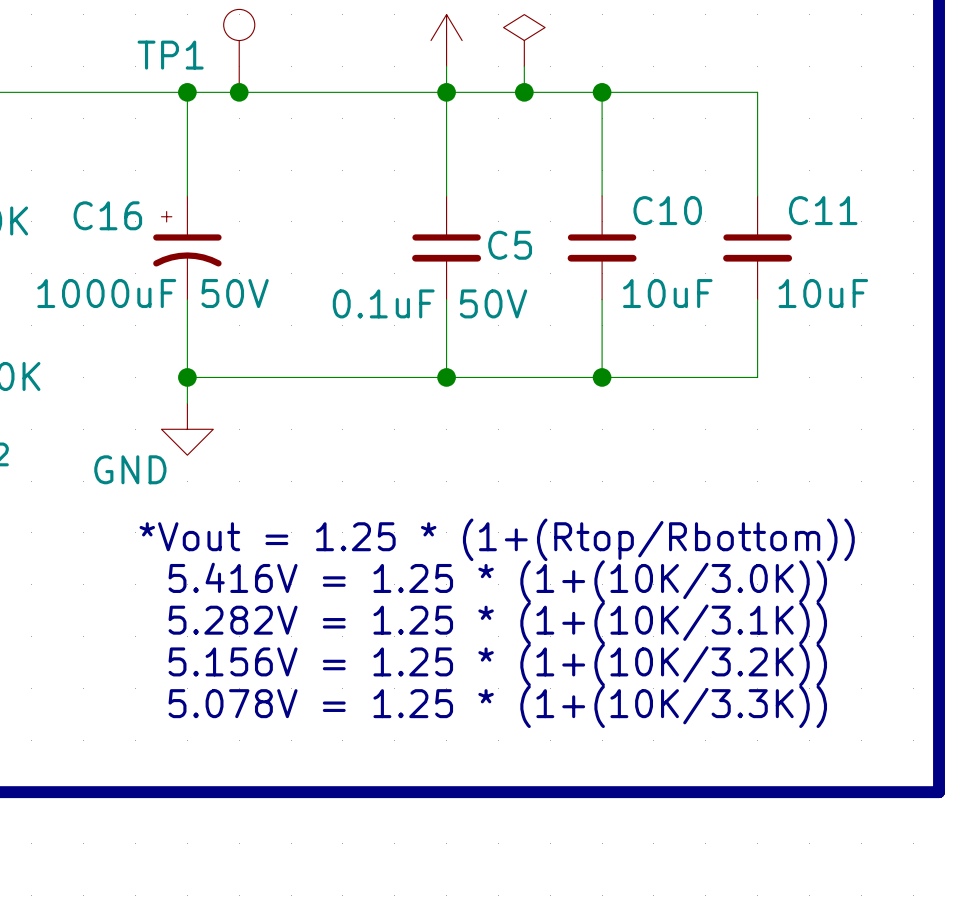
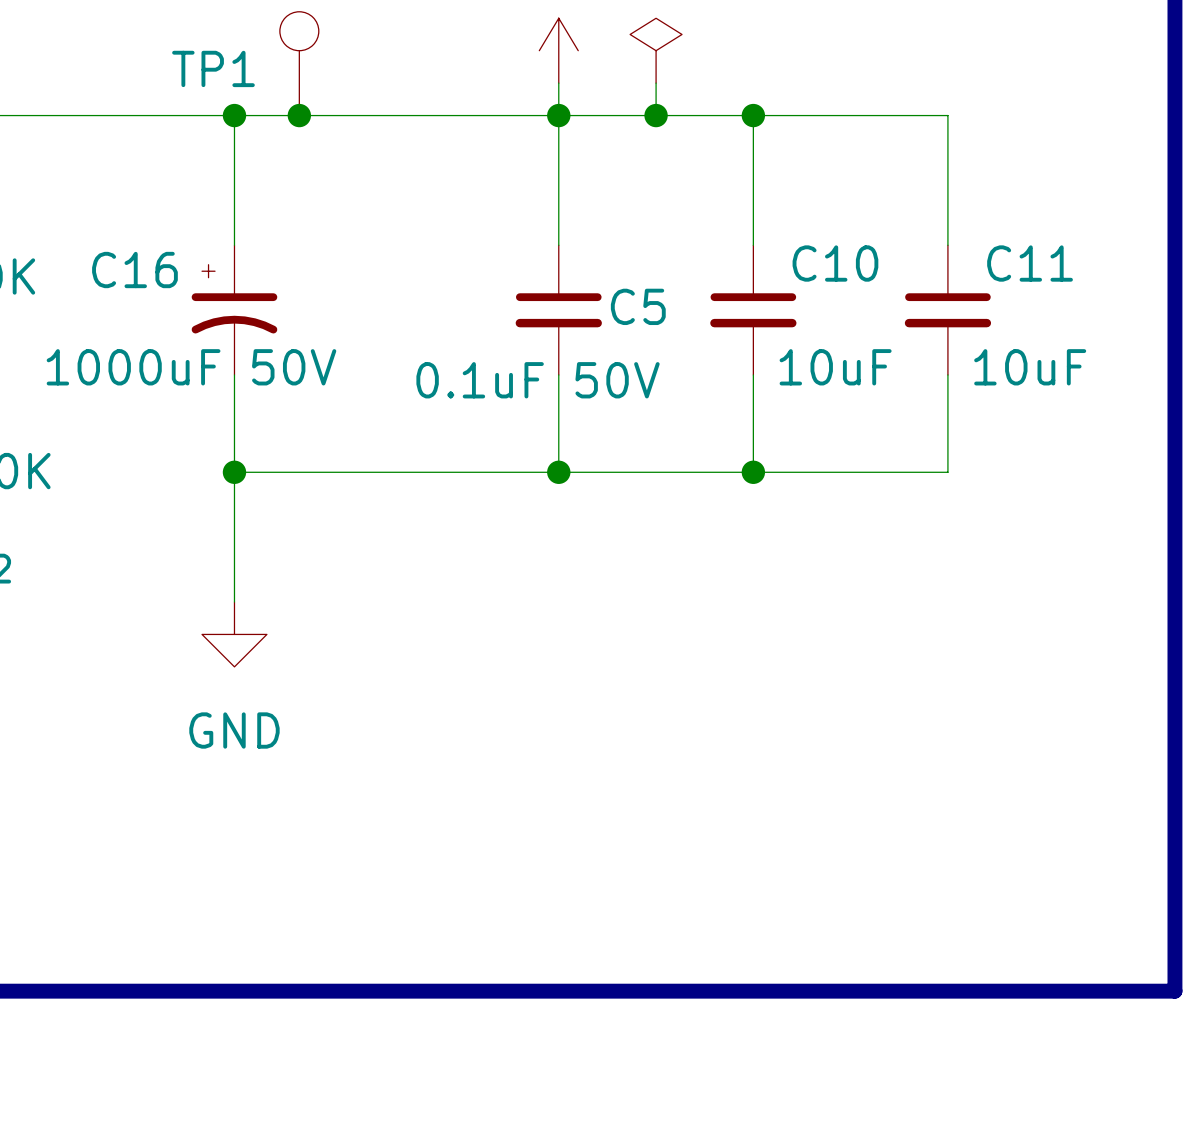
wire: none -> (234, 504) (234, 602)
power symbol position: GND (187, 429) -> GND (234, 634)
power symbol text position: GND (130, 469) -> GND (234, 730)
text: *Vout = 1.25 * (1+(Rtop/Rbottom)) (497, 539) -> none
text: 5.416V = 1.25 * (1+(10K/3.0K)) (497, 581) -> none
text: 5.282V = 1.25 * (1+(10K/3.1K)) (497, 623) -> none
text: 5.156V = 1.25 * (1+(10K/3.2K)) (497, 665) -> none
text: 5.078V = 1.25 * (1+(10K/3.3K)) (497, 706) -> none

